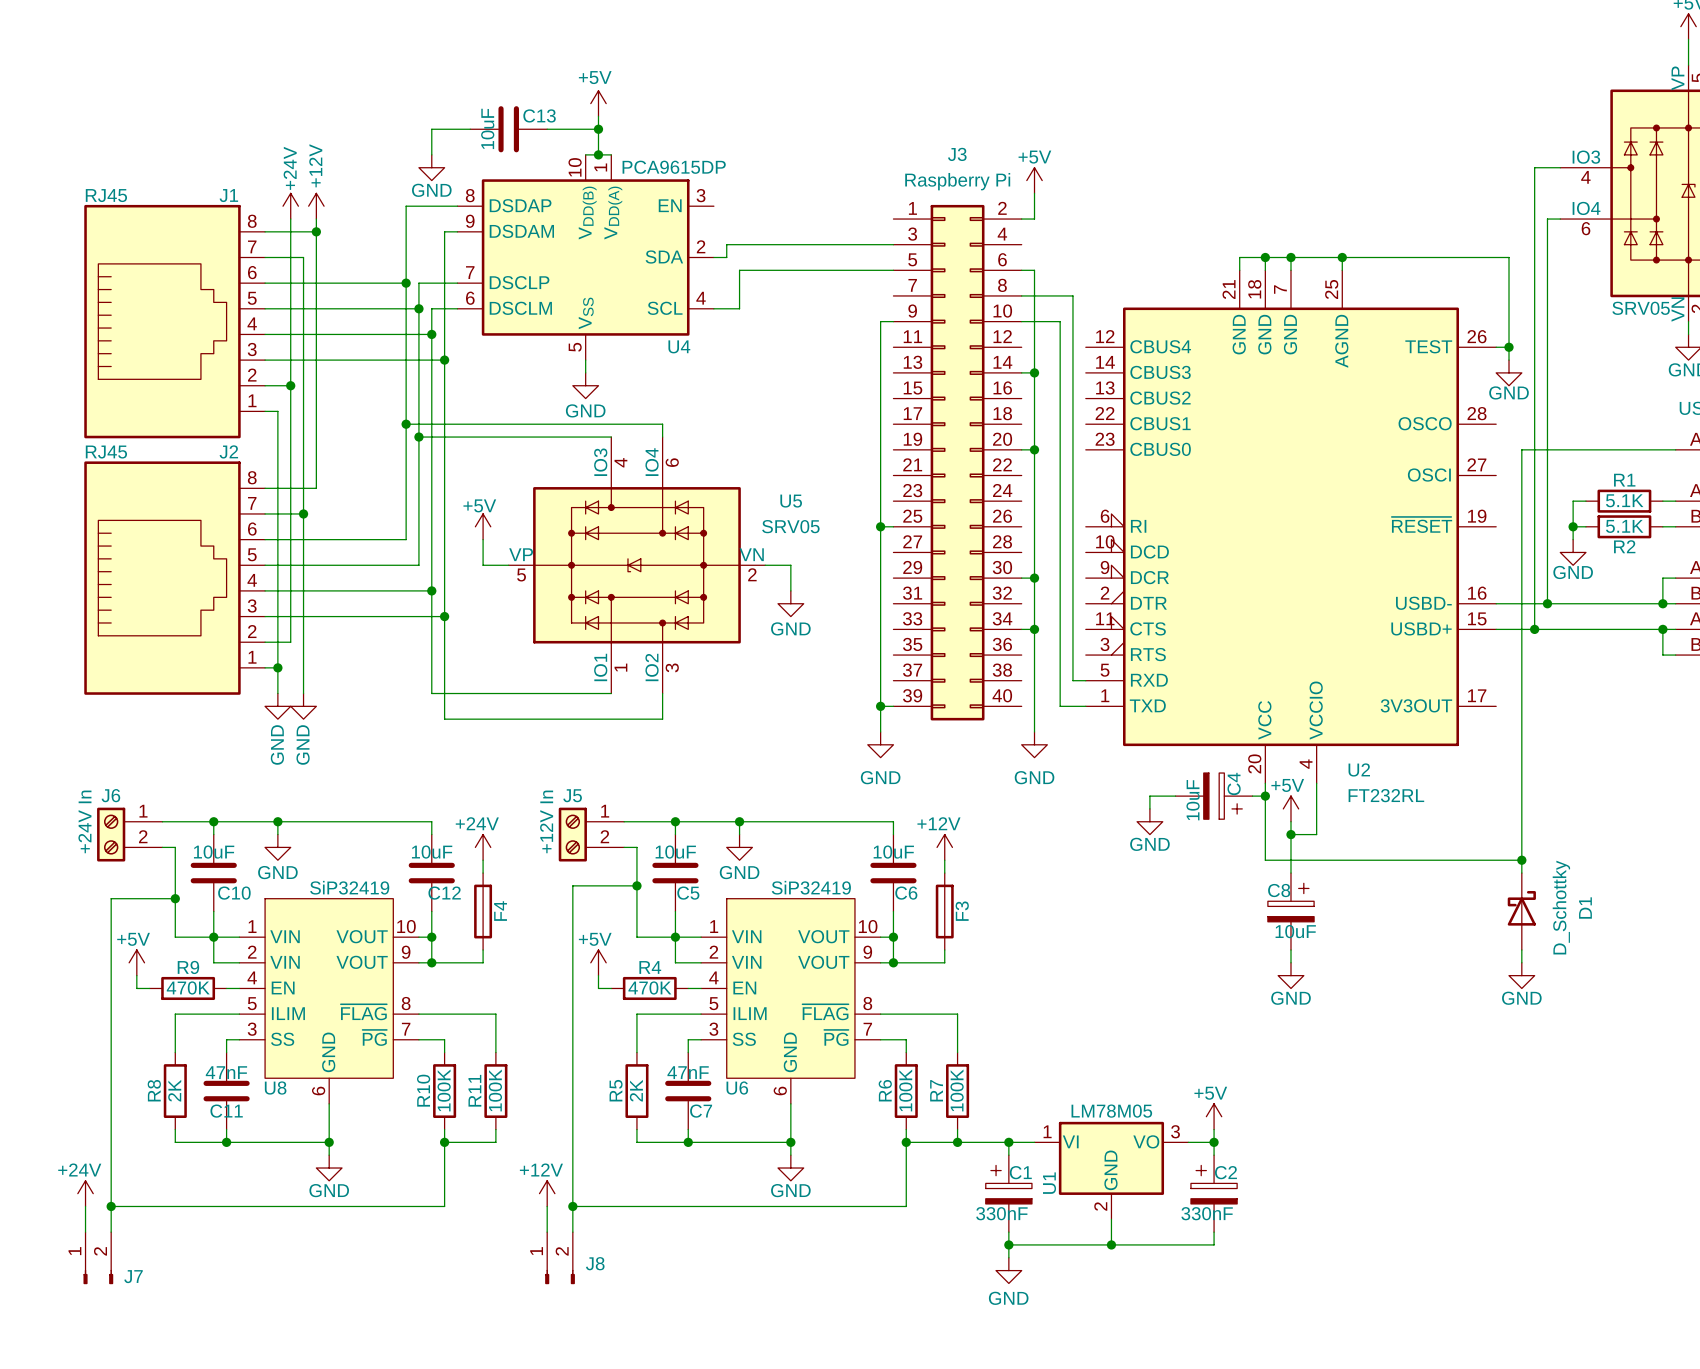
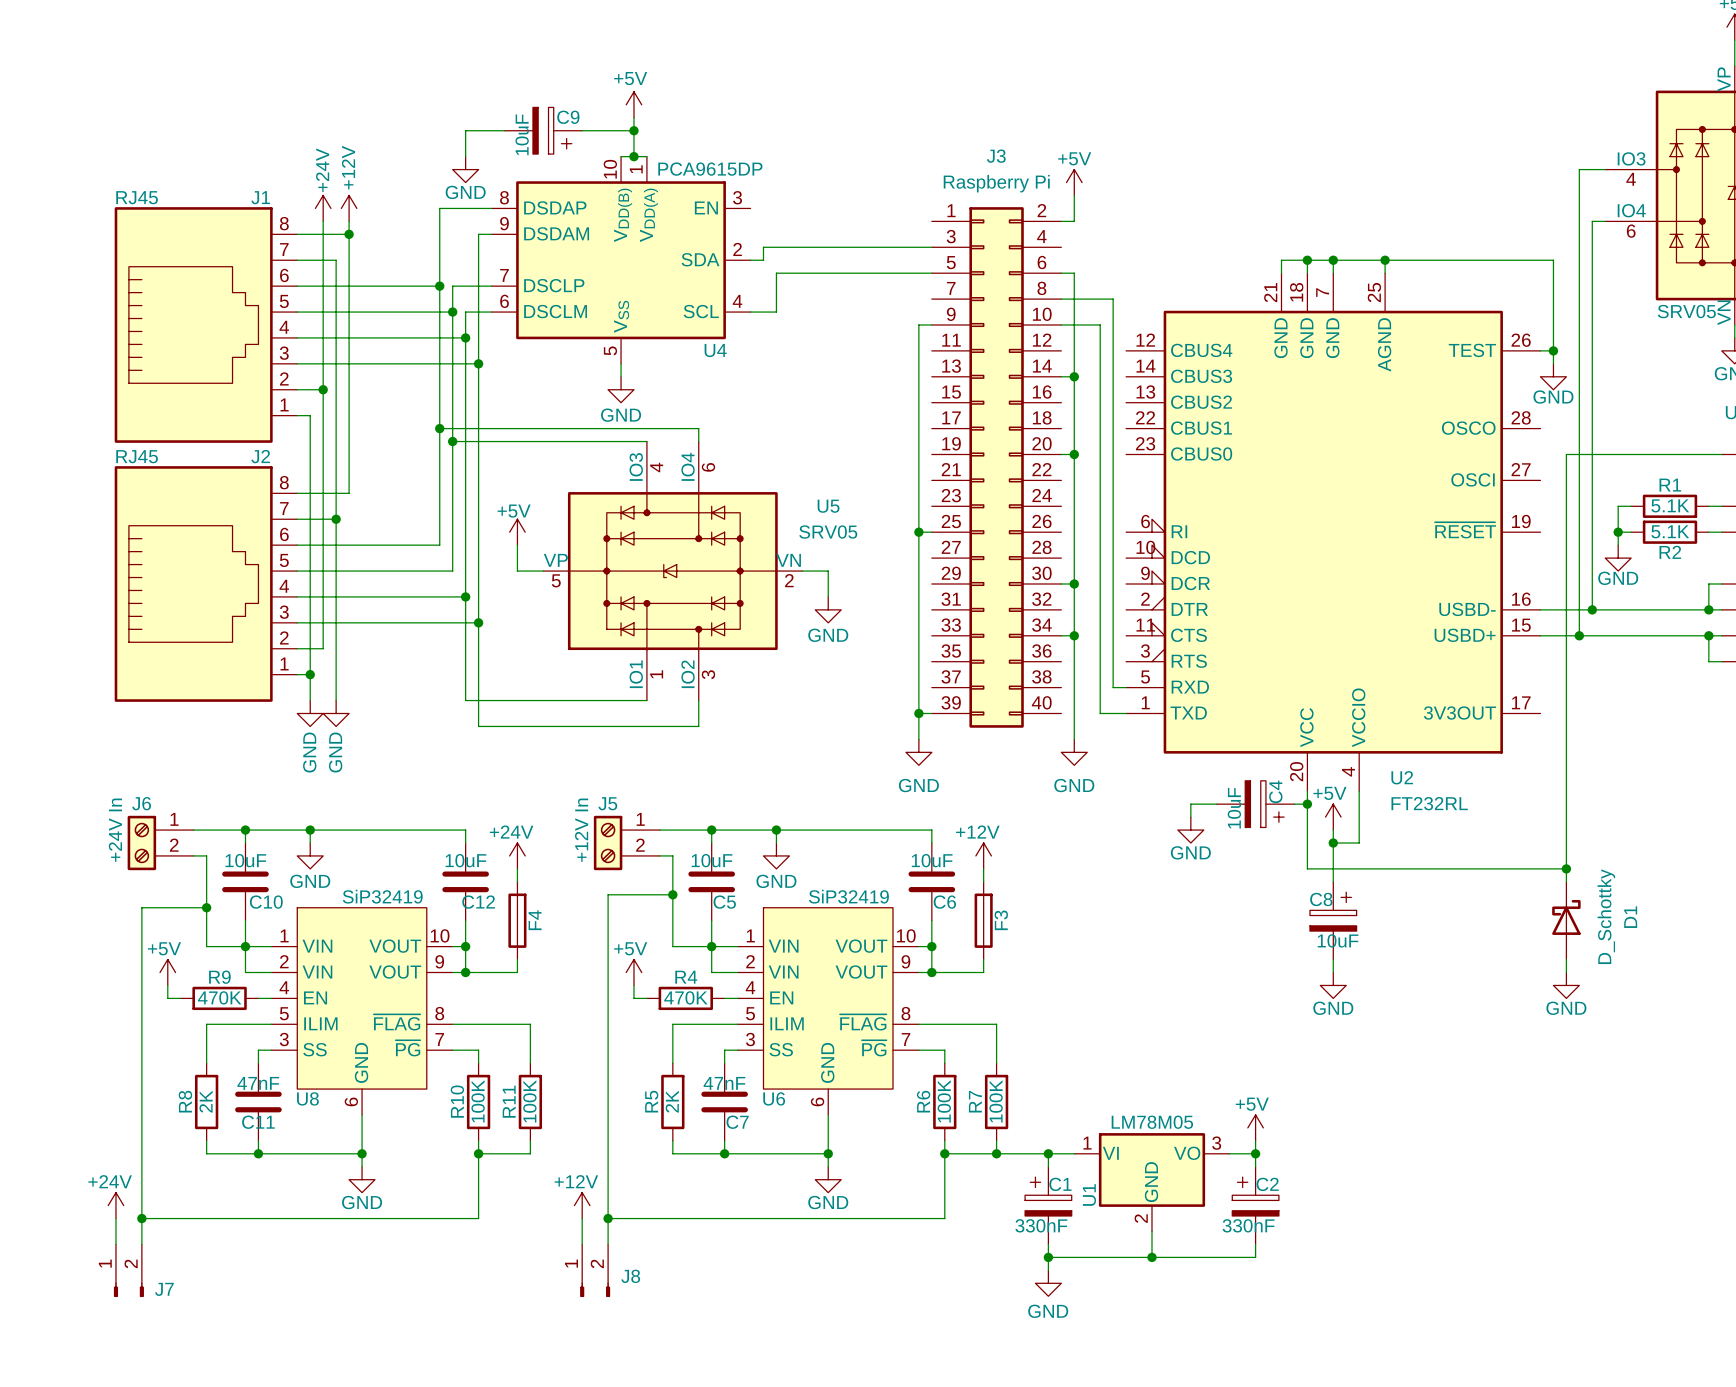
C13: 10uF (508, 129) -> none
C9: none -> 10uF (543, 130)

